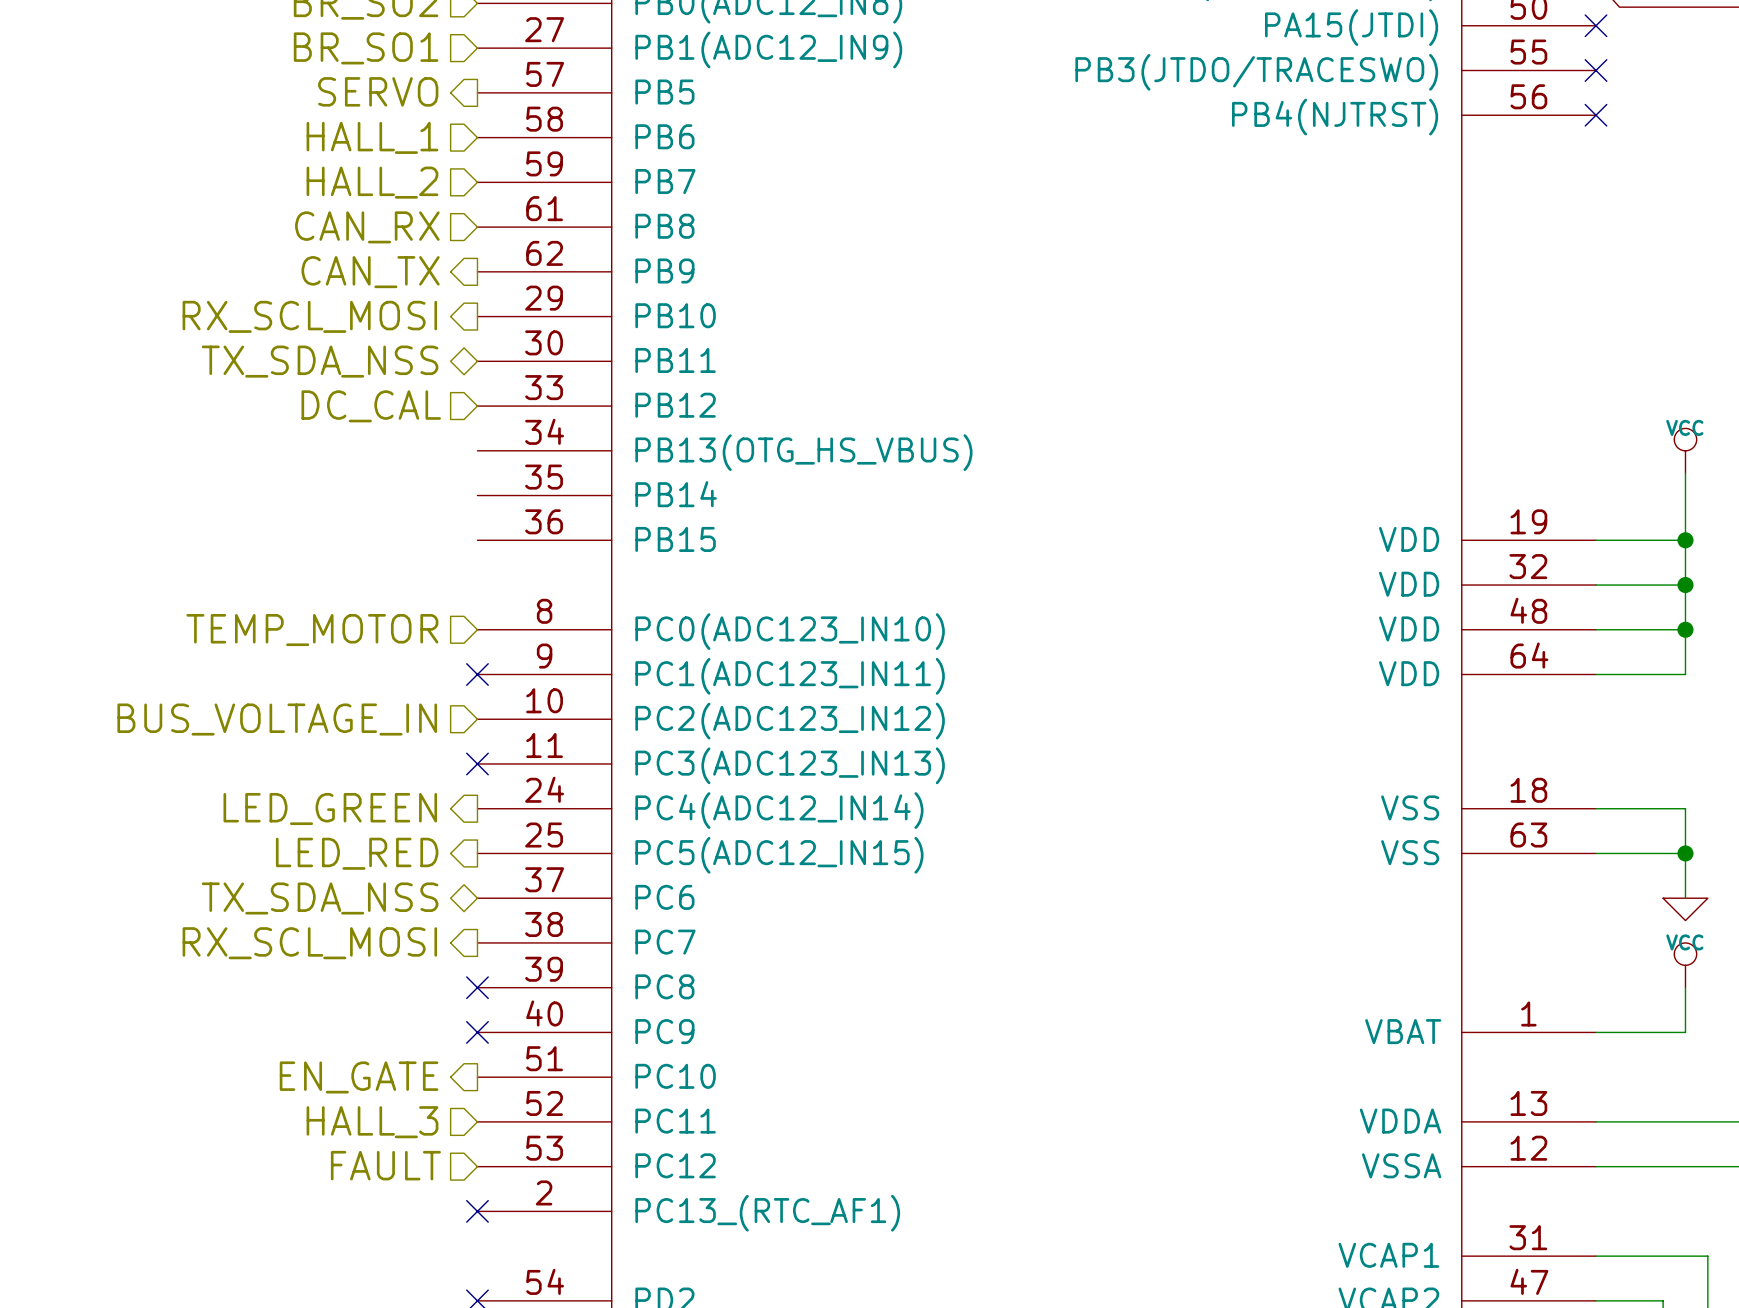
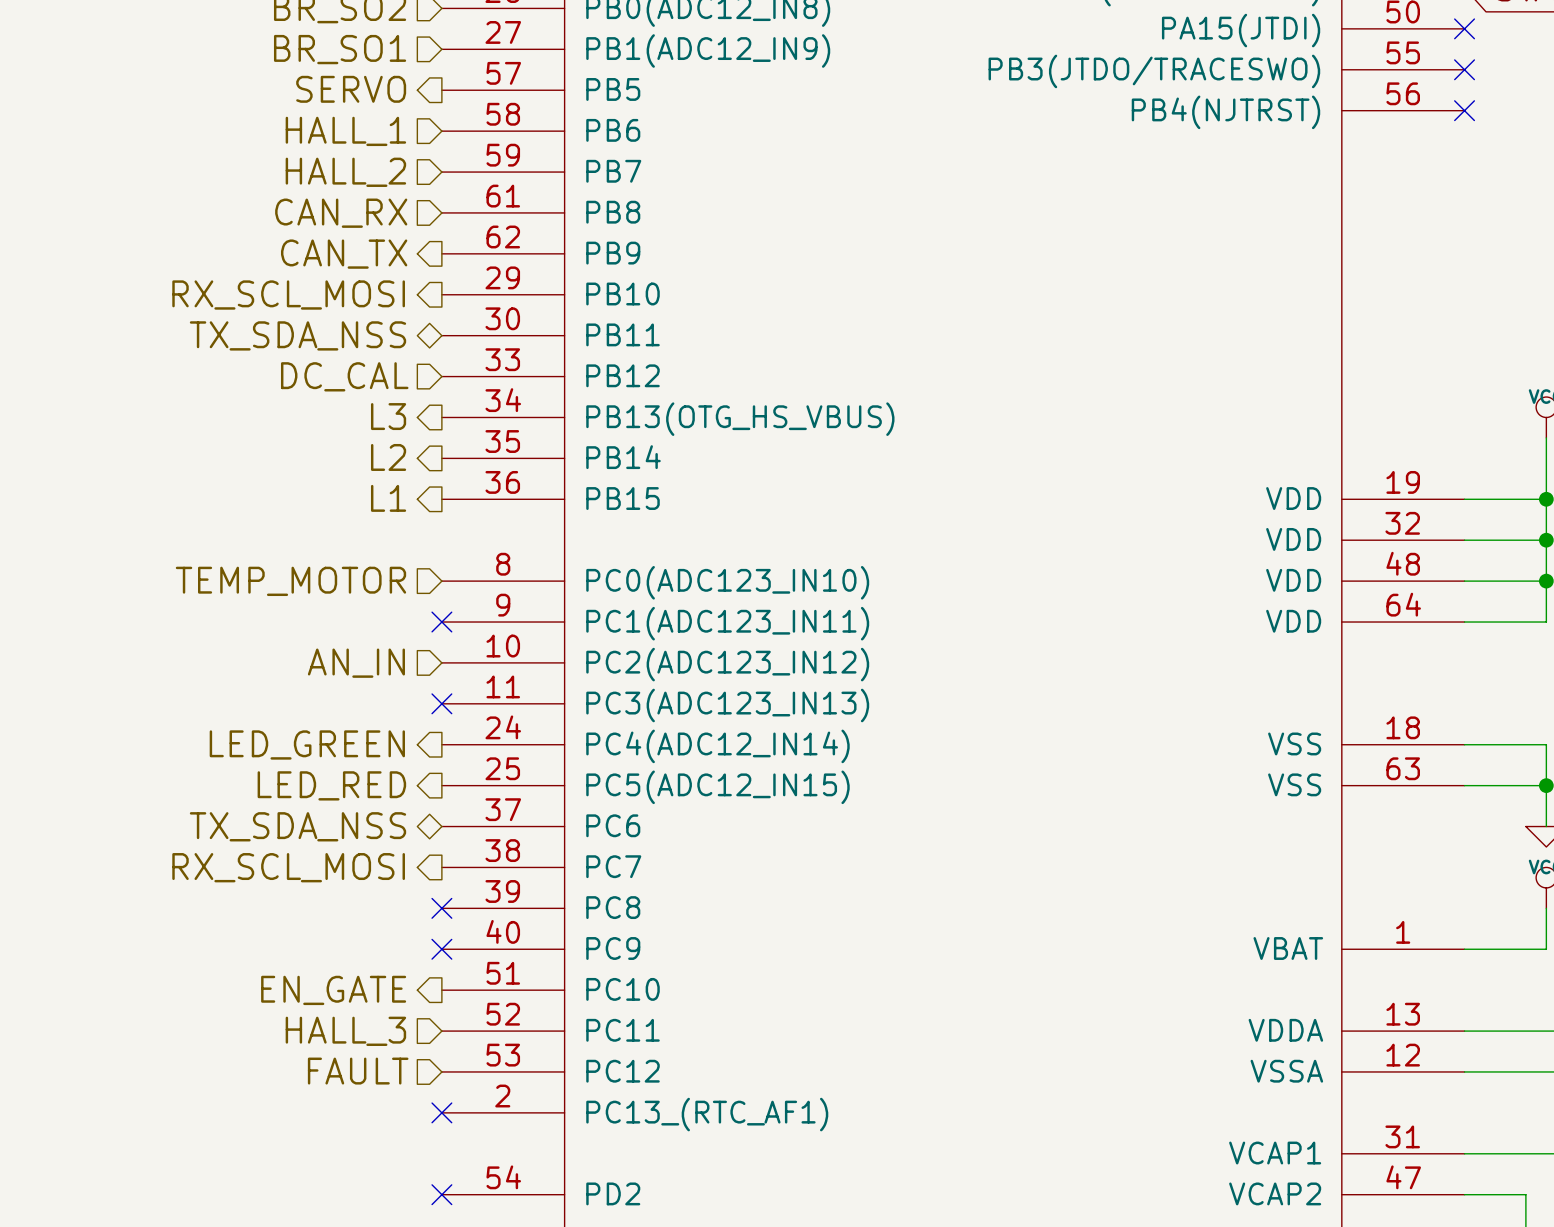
hierarchical label: none -> L3 (388, 416)
hierarchical label: none -> L2 (388, 457)
hierarchical label: none -> L1 (388, 498)
hierarchical label: BUS_VOLTAGE_IN (277, 719) -> AN_IN (356, 663)

